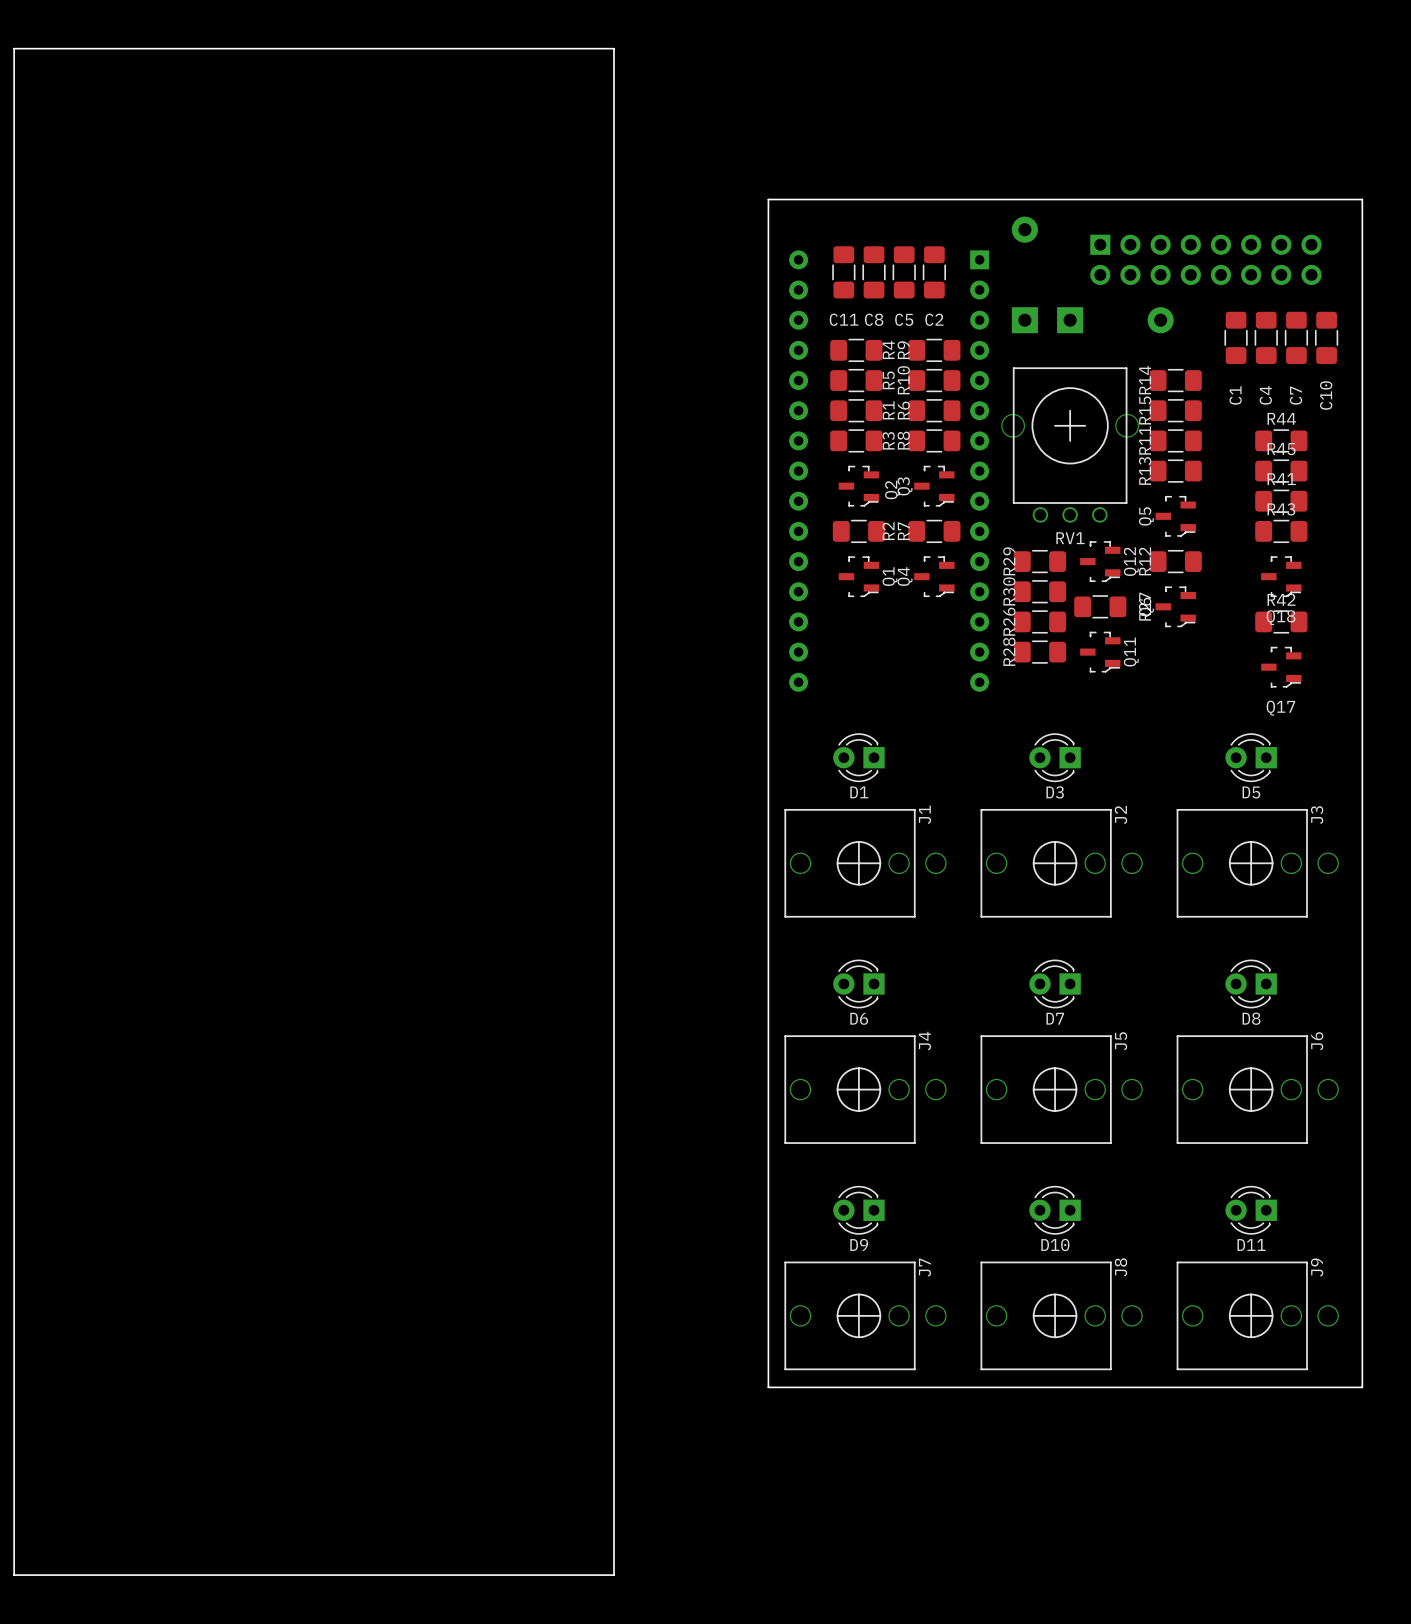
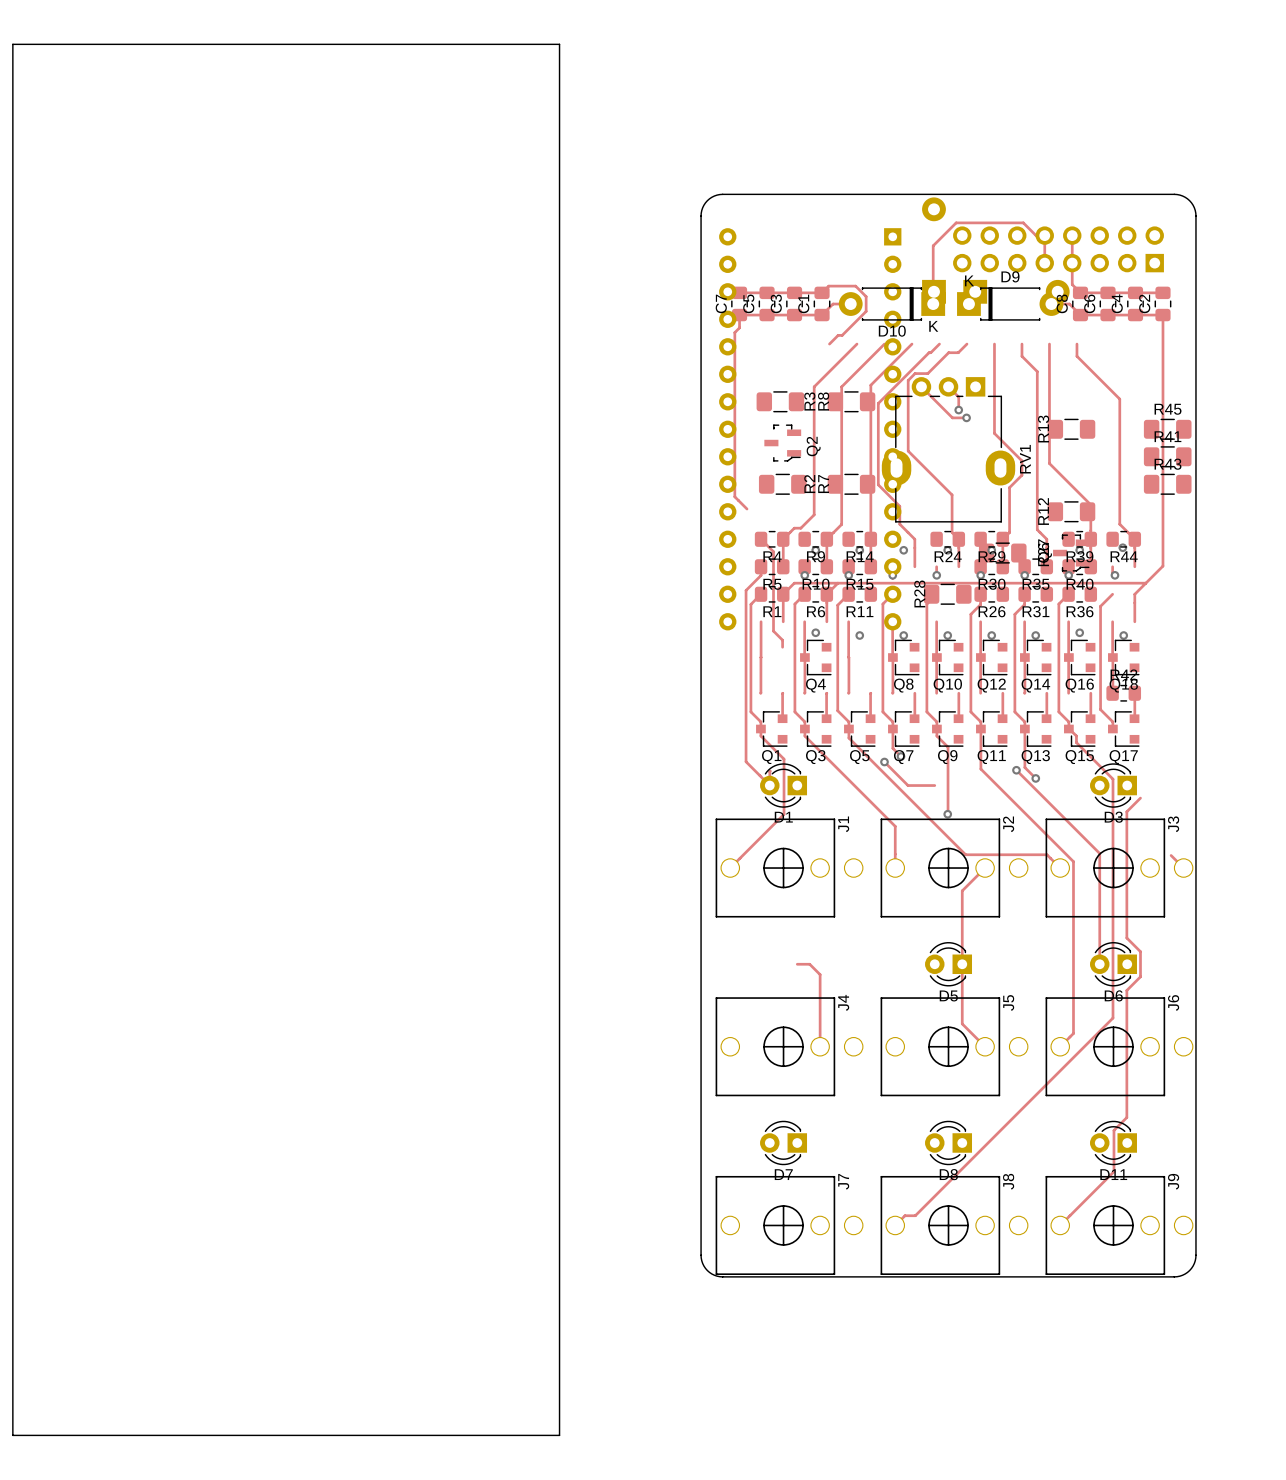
board edge: (768, 199) (1362, 199) (1362, 1387) (768, 1387) (768, 199) -> (722, 194) (714, 196) (707, 200) (702, 207) (701, 216) (701, 1255) (702, 1263) (709, 1272) (722, 1276) (1174, 1276) (1182, 1275) (1191, 1268) (1195, 1255) (1195, 216) (1194, 207) (1187, 198) (1174, 194) (722, 194)
C8 footprint: [862, 246, 886, 299] -> [1072, 286, 1089, 322]
C5 footprint: [892, 246, 916, 299] -> [758, 286, 776, 322]
C2 footprint: [922, 246, 946, 299] -> [1154, 286, 1172, 322]
track: none -> (1072, 235) (1072, 284) (1080, 292) (1162, 292)
part rotation: 0° (1205, 259) -> 180° (1058, 249)
C11: (843, 272) -> none
track: none -> (1044, 263) (1044, 235) (1036, 235) (1023, 222) (956, 222) (933, 245) (933, 304)
C1 footprint: [1224, 311, 1248, 365] -> [813, 286, 831, 322]
C4 footprint: [1254, 311, 1278, 365] -> [1127, 286, 1144, 322]
C7 footprint: [1284, 311, 1308, 365] -> [731, 286, 748, 322]
C8 name position: C8 (874, 319) -> C8 (1062, 303)
C5 name position: C5 (904, 319) -> C5 (748, 303)
C2 name position: C2 (934, 319) -> C2 (1144, 303)
track: none -> (739, 292) (822, 292) (828, 286) (855, 286) (866, 296) (866, 311) (842, 335) (838, 335) (829, 344)
C3: none -> (794, 303)
track: none -> (850, 304) (833, 304) (822, 315) (739, 315) (739, 327) (734, 332) (734, 496) (747, 509)
track: none -> (1051, 304) (1069, 304) (1080, 315) (1162, 315) (1162, 566) (1134, 594) (1134, 621)
C6: none -> (1107, 303)
C10: (1326, 337) -> none
R4 footprint: [830, 338, 883, 362] -> [754, 530, 790, 548]
R9 footprint: [908, 338, 961, 362] -> [798, 530, 834, 548]
R4 name position: R4 (888, 349) -> R4 (772, 556)
R9 name position: R9 (903, 350) -> R9 (816, 556)
RV1 footprint: [1001, 367, 1140, 523] -> [881, 377, 1016, 523]
R5 footprint: [830, 369, 883, 393] -> [754, 558, 790, 576]
R10 footprint: [908, 369, 961, 393] -> [798, 558, 834, 576]
R14 footprint: [1149, 369, 1202, 393] -> [842, 530, 878, 548]
track: none -> (856, 344) (814, 386) (814, 514) (800, 528) (794, 528) (783, 539) (783, 566)
track: none -> (884, 344) (841, 386) (841, 524) (826, 539) (826, 566)
track: none -> (911, 344) (870, 385) (870, 566)
track: none -> (939, 344) (878, 403) (878, 484) (899, 506) (899, 524) (914, 539) (914, 566)
track: none -> (966, 344) (958, 352) (948, 352) (927, 373) (915, 373) (908, 380) (908, 451) (952, 494) (952, 532) (958, 539) (958, 566)
track: none -> (994, 344) (994, 433) (1021, 460) (1021, 475) (1009, 487) (1009, 532) (1002, 539) (1002, 566)
track: none -> (1021, 344) (1021, 356) (1037, 371) (1037, 529) (1046, 539) (1046, 566)
track: none -> (1049, 344) (1049, 463) (1090, 504) (1090, 566)
track: none -> (1076, 344) (1076, 356) (1119, 399) (1119, 524) (1134, 539) (1134, 566)
R5 name position: R5 (888, 380) -> R5 (772, 584)
R10 name position: R10 (903, 380) -> R10 (816, 584)
R14 name position: R14 (1145, 380) -> R14 (860, 556)
C1 name position: C1 (1235, 395) -> C1 (803, 303)
C4 name position: C4 (1265, 395) -> C4 (1117, 303)
C7 name position: C7 (1295, 395) -> C7 (721, 303)
R1 footprint: [830, 399, 883, 423] -> [754, 585, 790, 603]
R6 footprint: [908, 399, 961, 423] -> [798, 585, 834, 603]
R15 footprint: [1149, 399, 1202, 423] -> [842, 558, 878, 576]
R1 name position: R1 (888, 410) -> R1 (772, 611)
R6 name position: R6 (903, 410) -> R6 (816, 611)
R15 name position: R15 (1145, 410) -> R15 (860, 584)
R44 name position: R44 (1281, 418) -> R44 (1124, 556)
track: none -> (921, 386) (952, 417) (966, 417)
track: none -> (948, 386) (958, 397) (958, 410)
R11 footprint: [1149, 429, 1202, 453] -> [842, 585, 878, 603]
R44 footprint: [1255, 429, 1308, 453] -> [1106, 530, 1142, 548]
R11 name position: R11 (1145, 440) -> R11 (860, 611)
via: none -> (958, 410)
via: none -> (966, 417)
Q3 footprint: [914, 465, 955, 507] -> [800, 711, 832, 747]
Q3 name position: Q3 (905, 486) -> Q3 (815, 757)
Q5 footprint: [1155, 496, 1196, 537] -> [844, 711, 876, 747]
Q5 name position: Q5 (1146, 516) -> Q5 (859, 757)
RV1 name position: RV1 (1070, 538) -> RV1 (1025, 459)
Q12 footprint: [1080, 541, 1121, 582] -> [976, 639, 1008, 676]
R29 footprint: [1013, 550, 1067, 574] -> [974, 530, 1010, 548]
Q1 footprint: [838, 556, 880, 597] -> [756, 711, 788, 747]
Q4 footprint: [914, 556, 955, 597] -> [800, 639, 832, 676]
Q18 footprint: [1261, 556, 1302, 597] -> [1108, 639, 1140, 676]
R29 name position: R29 (1009, 561) -> R29 (992, 556)
Q12 name position: Q12 (1131, 561) -> Q12 (991, 685)
Q1 name position: Q1 (889, 576) -> Q1 (771, 757)
Q4 name position: Q4 (905, 576) -> Q4 (815, 685)
R30 footprint: [1013, 580, 1067, 604] -> [974, 558, 1010, 576]
track: none -> (761, 539) (773, 551) (773, 631) (782, 640) (782, 647)
R30 name position: R30 (1009, 591) -> R30 (992, 584)
R24: none -> (947, 539)
R39: none -> (1079, 539)
via: none -> (1122, 547)
via: none -> (815, 550)
via: none -> (859, 550)
via: none -> (903, 550)
via: none -> (947, 550)
via: none -> (991, 550)
via: none -> (1079, 550)
R26 footprint: [1013, 610, 1067, 634] -> [974, 585, 1010, 603]
R42 footprint: [1255, 610, 1308, 634] -> [1106, 684, 1142, 702]
track: none -> (761, 566) (761, 575) (746, 590) (746, 761) (769, 785) (770, 771)
R26 name position: R26 (1009, 621) -> R26 (992, 611)
track: none -> (936, 566) (936, 575)
R35: none -> (1035, 566)
R40: none -> (1079, 566)
track: none -> (1112, 566) (1112, 572) (1114, 575)
via: none -> (804, 575)
via: none -> (848, 575)
via: none -> (892, 575)
via: none -> (936, 575)
via: none -> (980, 575)
Q11 footprint: [1080, 631, 1121, 673] -> [976, 711, 1008, 747]
via: none -> (1024, 575)
via: none -> (1068, 575)
via: none -> (1114, 575)
track: none -> (837, 583) (826, 594) (826, 621)
track: none -> (1145, 583) (794, 583) (783, 594) (783, 621)
Q17 footprint: [1261, 646, 1302, 688] -> [1108, 711, 1140, 747]
track: none -> (761, 594) (750, 604) (750, 711) (760, 721) (760, 736) (784, 759) (784, 814) (730, 868)
track: none -> (804, 594) (794, 604) (794, 711) (804, 721) (804, 736) (895, 826) (895, 868)
track: none -> (848, 594) (837, 605) (837, 710) (848, 721) (848, 738) (965, 854) (1046, 854) (1060, 868)
track: none -> (892, 594) (882, 604) (882, 711) (892, 721) (892, 748) (900, 756)
track: none -> (936, 594) (926, 604) (926, 711) (936, 721) (936, 736) (948, 747) (947, 814)
track: none -> (980, 594) (980, 604) (970, 614) (970, 711) (980, 721) (980, 769) (1073, 861) (1073, 1033) (1060, 1046)
track: none -> (1024, 594) (1024, 604) (1014, 614) (1014, 711) (1024, 721) (1024, 767) (1035, 778)
Q11 name position: Q11 (1131, 652) -> Q11 (991, 757)
R31: none -> (1035, 594)
track: none -> (1068, 594) (1058, 604) (1058, 711) (1068, 721) (1068, 729) (1076, 736) (1076, 742) (1113, 779) (1113, 1018) (915, 1215) (904, 1215) (895, 1225)
R36: none -> (1079, 594)
track: none -> (1112, 594) (1100, 606) (1100, 709) (1112, 721) (1112, 729)
track: none -> (761, 621) (761, 657)
track: none -> (804, 621) (804, 693)
track: none -> (848, 621) (848, 693)
track: none -> (892, 621) (892, 693)
track: none -> (936, 621) (936, 693)
track: none -> (980, 621) (980, 693)
track: none -> (1024, 621) (1024, 693)
track: none -> (1068, 621) (1068, 693)
track: none -> (1112, 621) (1112, 693)
via: none -> (815, 632)
via: none -> (1079, 632)
via: none -> (859, 635)
via: none -> (903, 635)
via: none -> (947, 635)
via: none -> (991, 635)
via: none -> (1035, 635)
via: none -> (1123, 635)
track: none -> (760, 657) (760, 693)
Q8: none -> (903, 657)
Q10: none -> (947, 657)
Q14: none -> (1035, 657)
Q16: none -> (1079, 657)
D1 position: (858, 757) -> (783, 785)
D3 position: (1055, 757) -> (1113, 785)
D5 position: (1251, 757) -> (948, 964)
track: none -> (782, 693) (782, 718)
track: none -> (826, 693) (826, 718)
track: none -> (870, 693) (870, 718)
track: none -> (914, 693) (914, 718)
track: none -> (958, 693) (958, 718)
track: none -> (1002, 693) (1002, 718)
track: none -> (1046, 693) (1046, 718)
track: none -> (1090, 693) (1090, 718)
track: none -> (1134, 693) (1134, 718)
Q7: none -> (903, 729)
Q9: none -> (947, 729)
Q13: none -> (1035, 729)
Q15: none -> (1079, 729)
via: none -> (900, 756)
track: none -> (884, 761) (908, 785) (934, 785)
via: none -> (884, 761)
track: none -> (1016, 770) (1099, 853) (1099, 964)
via: none -> (1016, 770)
via: none -> (1035, 778)
J1 position: (865, 863) -> (789, 868)
J2 position: (1061, 863) -> (954, 868)
J3 position: (1257, 863) -> (1119, 868)
track: none -> (1140, 798) (1126, 811) (1126, 938) (1140, 951) (1140, 976) (1126, 990) (1126, 1117) (1113, 1130) (1113, 1171) (1060, 1225)
via: none -> (947, 814)
track: none -> (1171, 855) (1183, 868)
track: none -> (985, 868) (962, 890) (962, 1023) (985, 1046)
D6 position: (858, 983) -> (1113, 964)
D7 position: (1055, 983) -> (783, 1142)
D8 position: (1251, 983) -> (948, 1142)
track: none -> (797, 964) (809, 964) (820, 974) (820, 1046)
J4 position: (865, 1089) -> (789, 1046)
J5 position: (1061, 1089) -> (954, 1046)
J6 position: (1257, 1089) -> (1119, 1046)
D9 footprint: [833, 1185, 885, 1235] -> [957, 287, 1064, 321]
D10 footprint: [1029, 1185, 1081, 1235] -> [838, 287, 946, 321]
D11 position: (1251, 1210) -> (1113, 1142)
D9 name position: D9 (859, 1244) -> D9 (1010, 276)
J7 position: (865, 1315) -> (789, 1225)
J8 position: (1061, 1315) -> (954, 1225)
J9 position: (1257, 1315) -> (1119, 1225)

